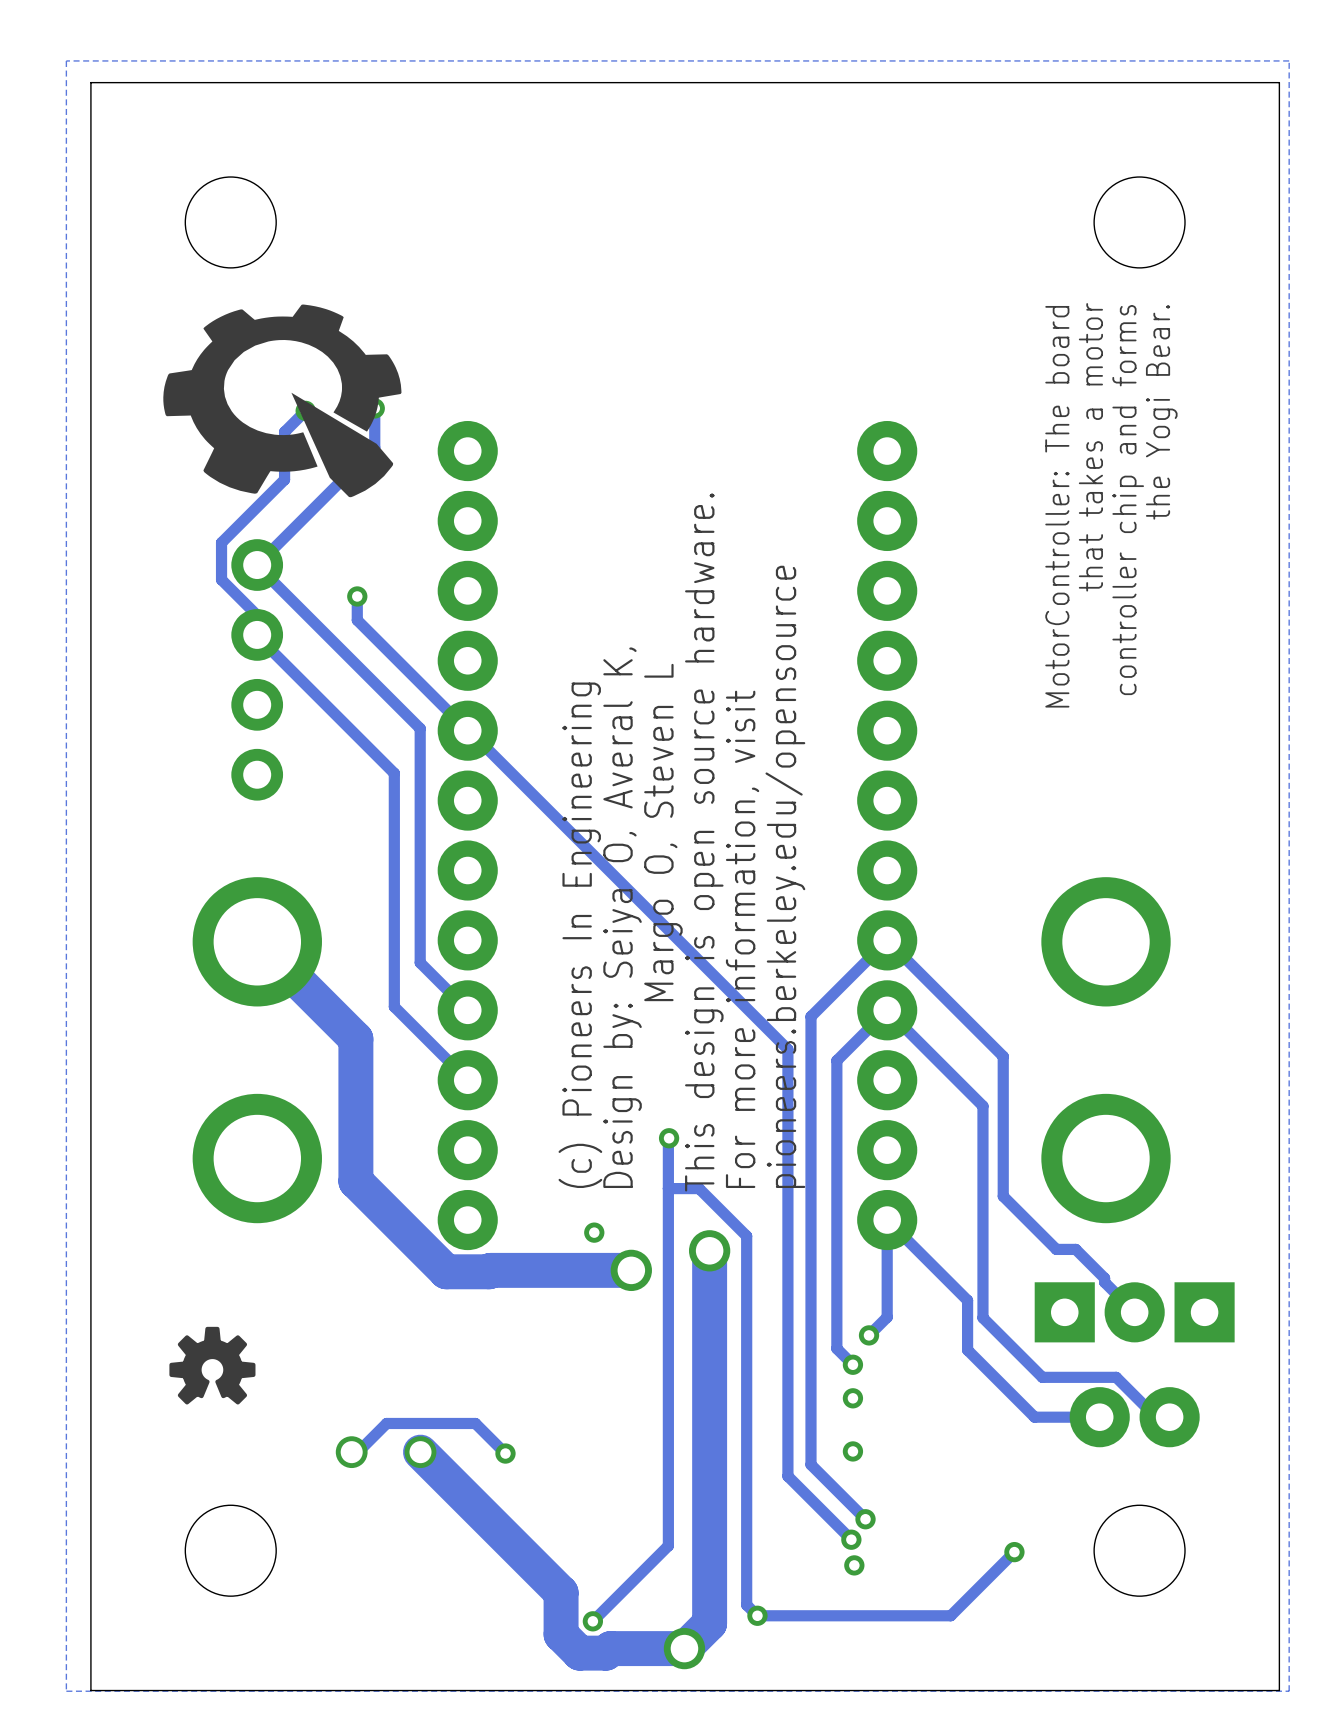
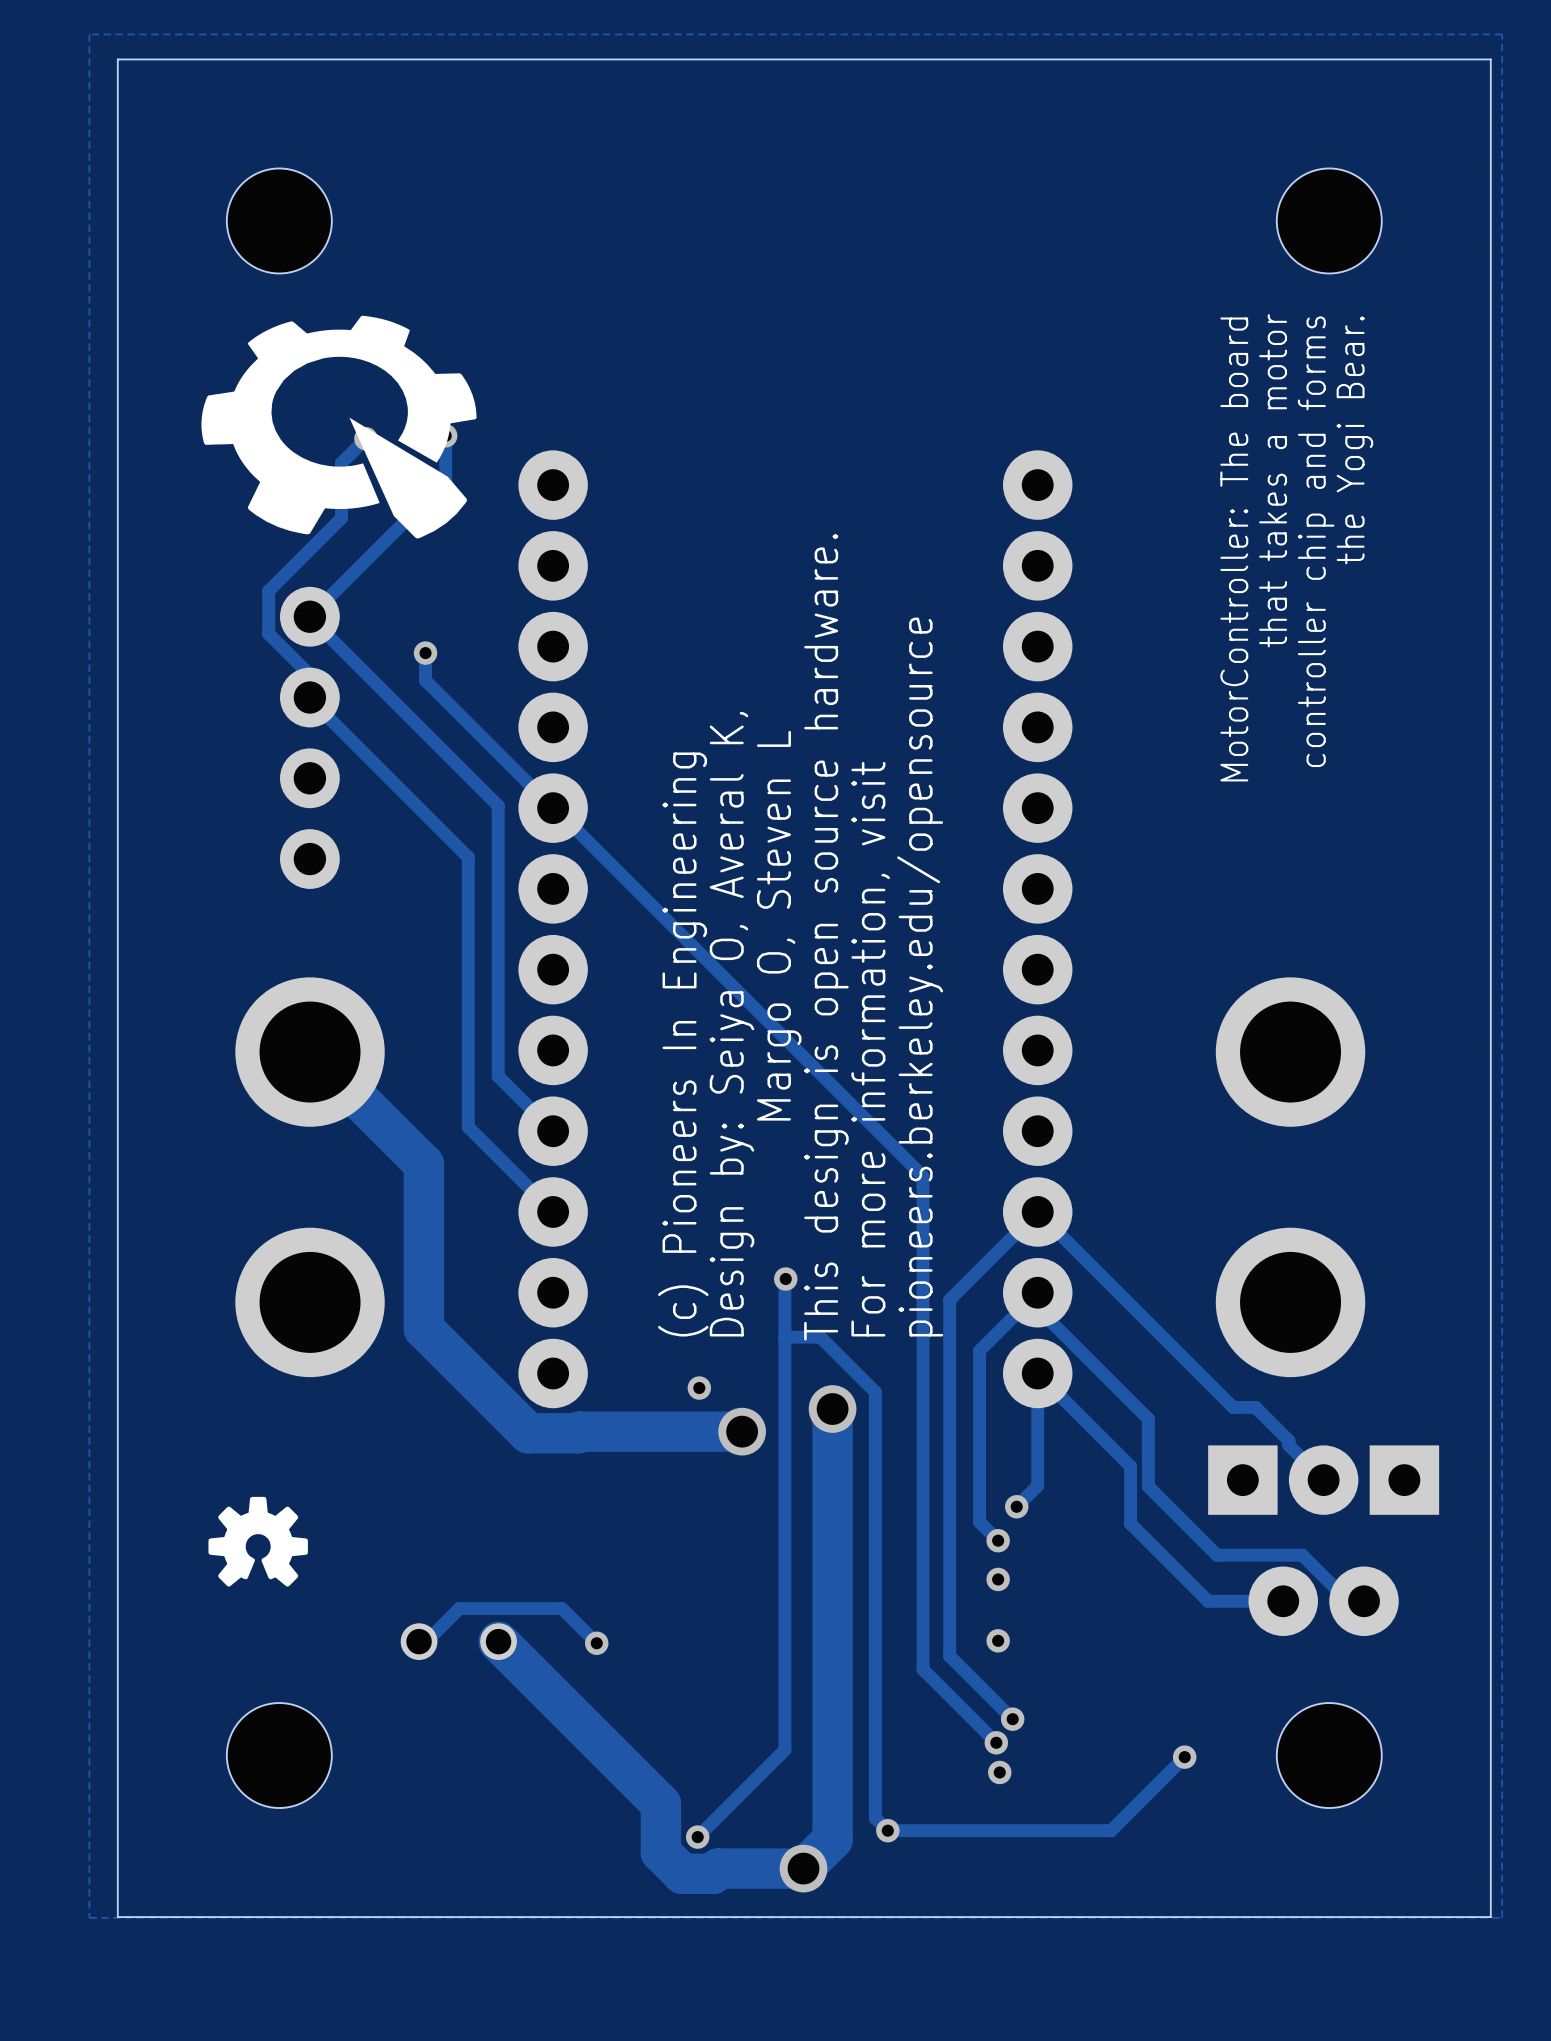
track: (810, 1156) (810, 1016) (887, 940) (1003, 1056) (1003, 1196) -> (949, 1300) (1037, 1211) (1171, 1346)
track: (836, 1200) (836, 1060) (887, 1010) (982, 1106) (982, 1259) -> (979, 1350) (1037, 1292) (1037, 1308) (1148, 1419)

